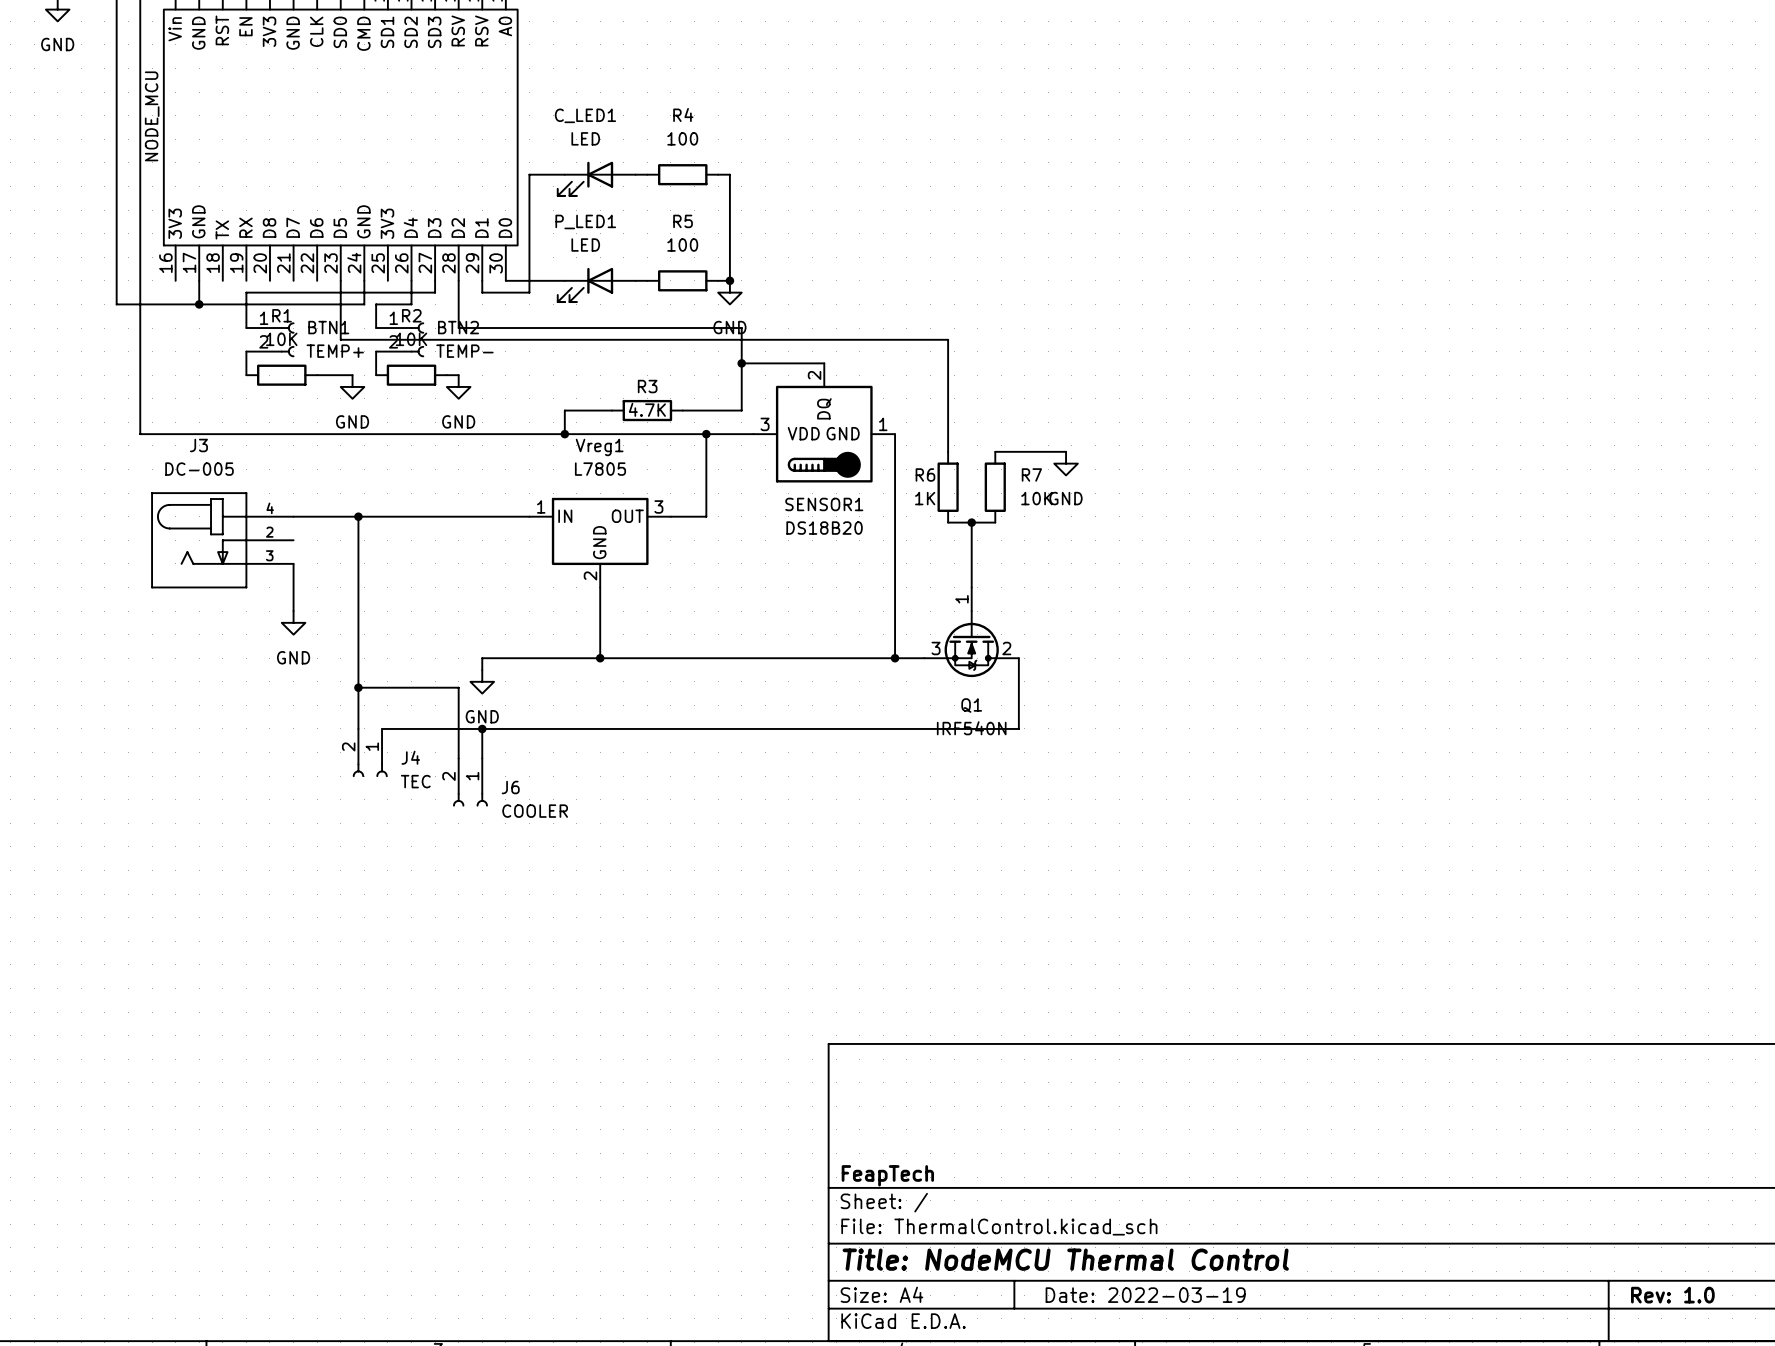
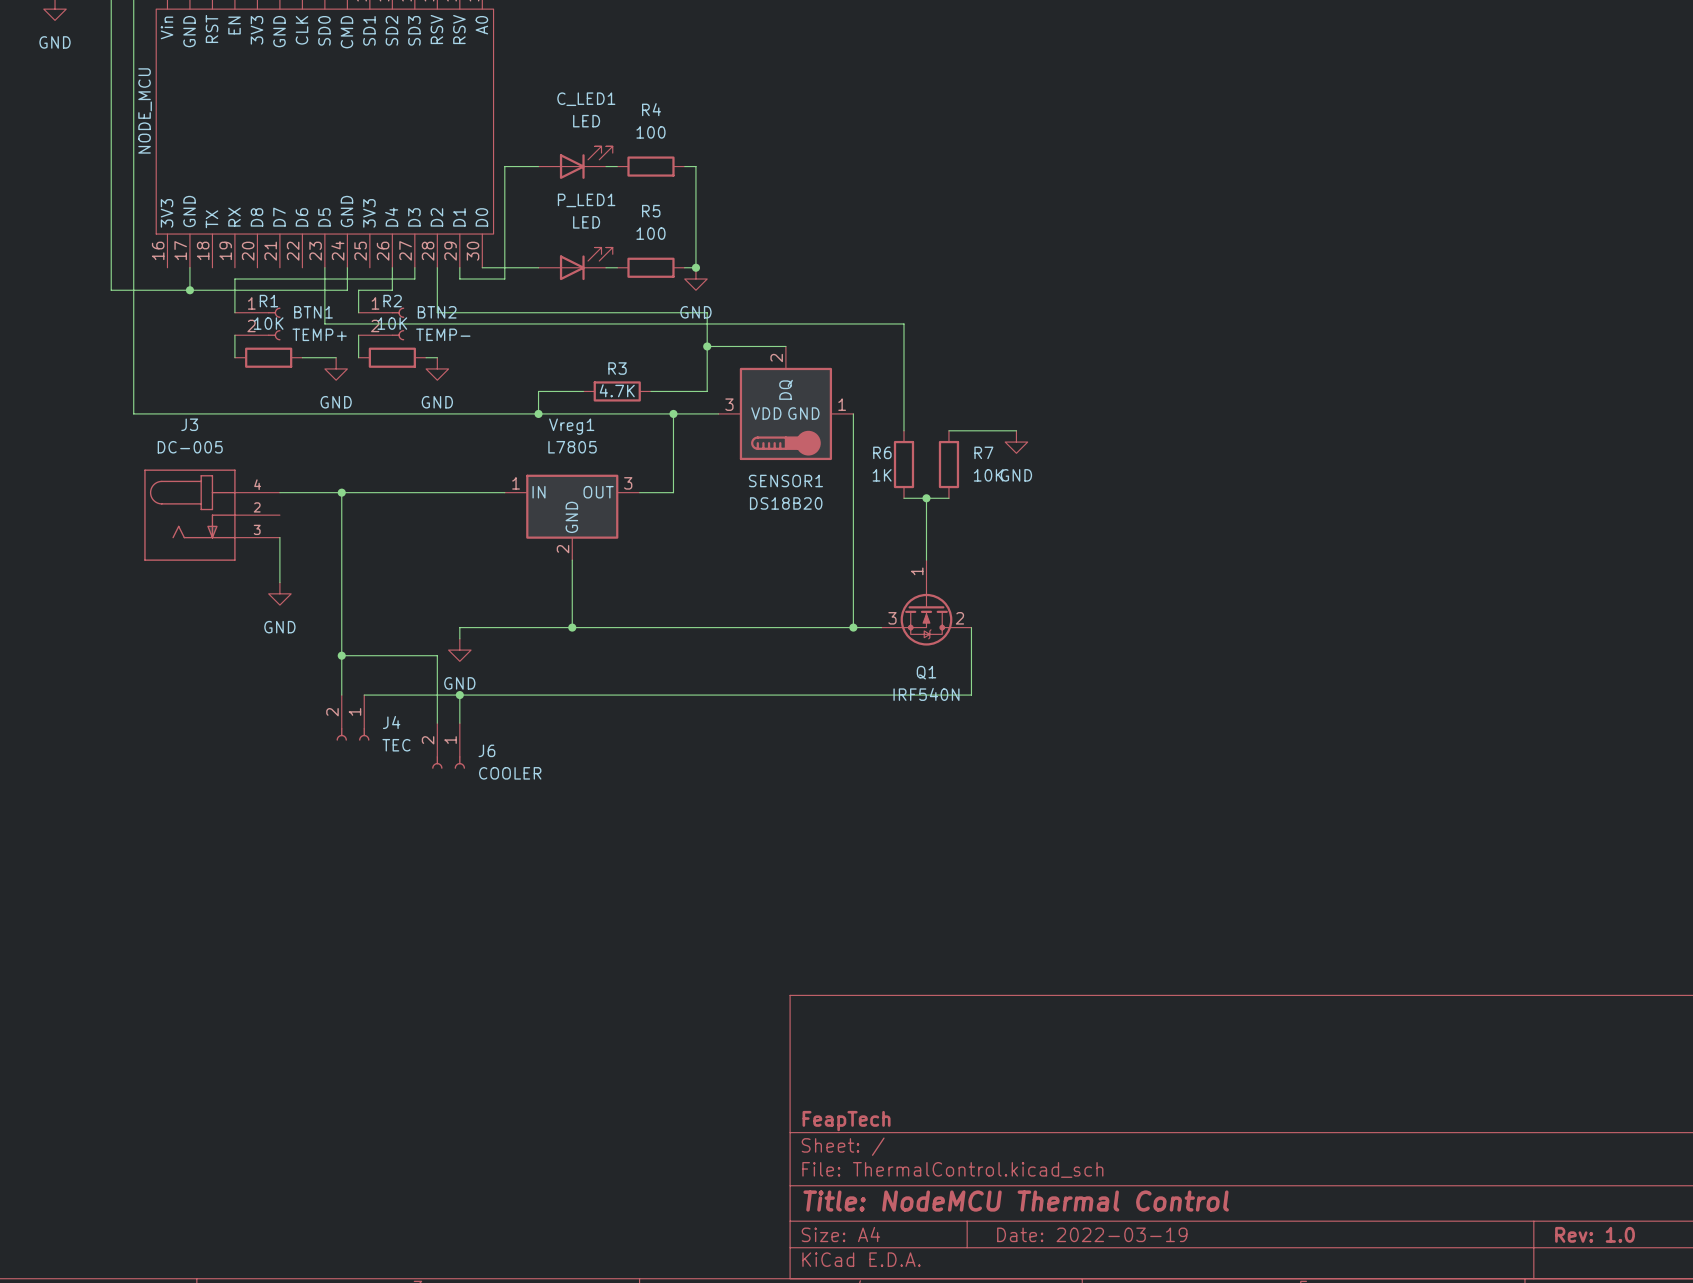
C_LED1 name position: C_LED1 (585, 115) -> C_LED1 (586, 99)
C_LED1 value position: LED (585, 138) -> LED (586, 121)
C_LED1 rotation: 0° (585, 178) -> 180° (586, 162)
P_LED1 name position: P_LED1 (585, 221) -> P_LED1 (586, 200)
P_LED1 value position: LED (585, 245) -> LED (586, 222)
P_LED1 rotation: 0° (585, 284) -> 180° (586, 263)

